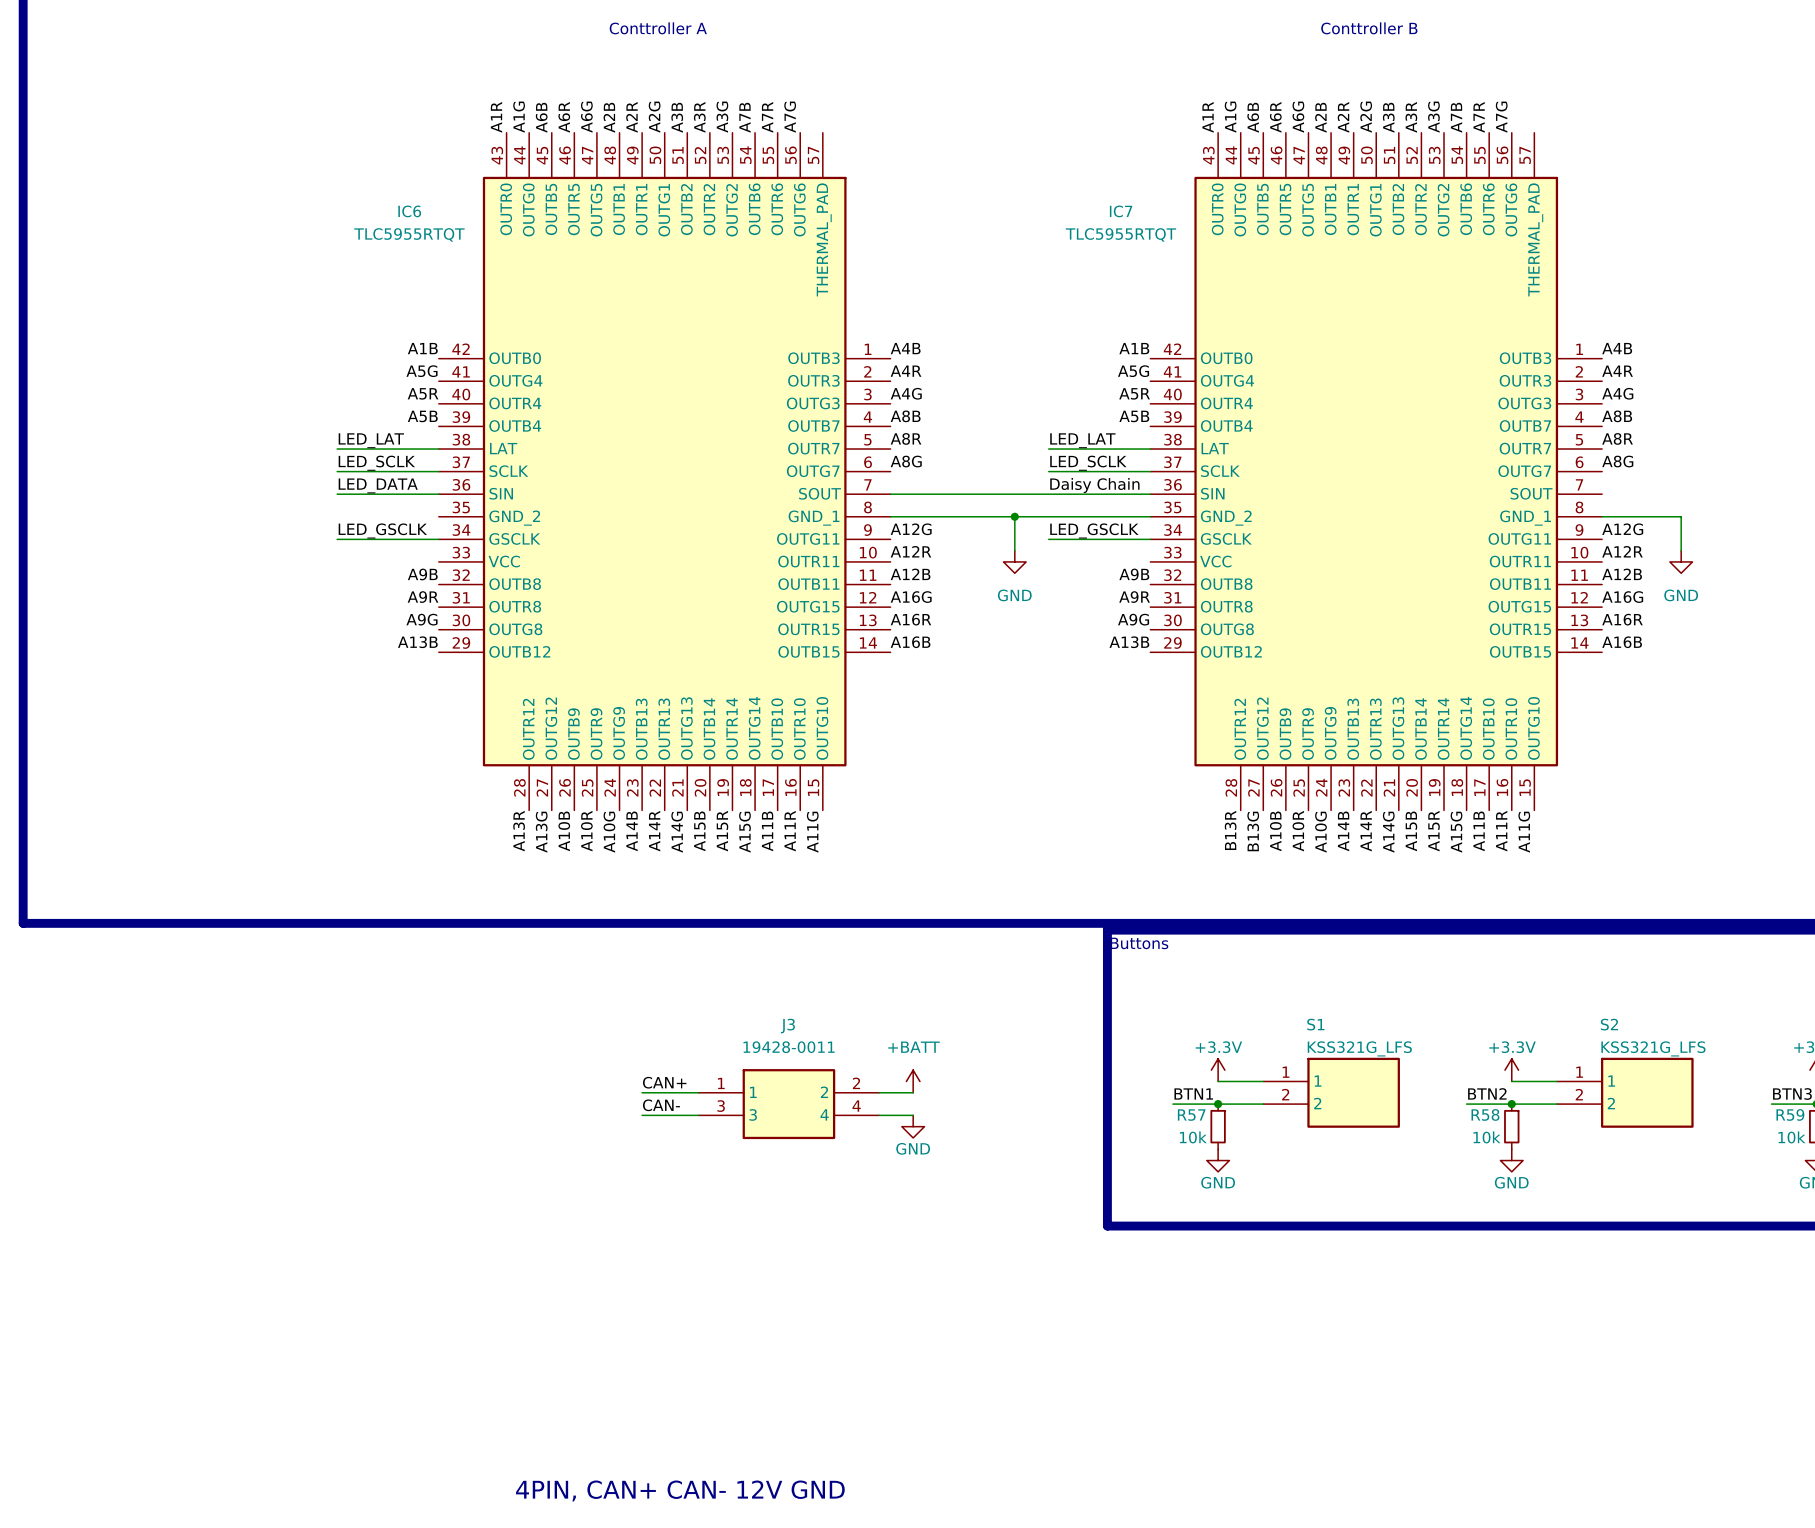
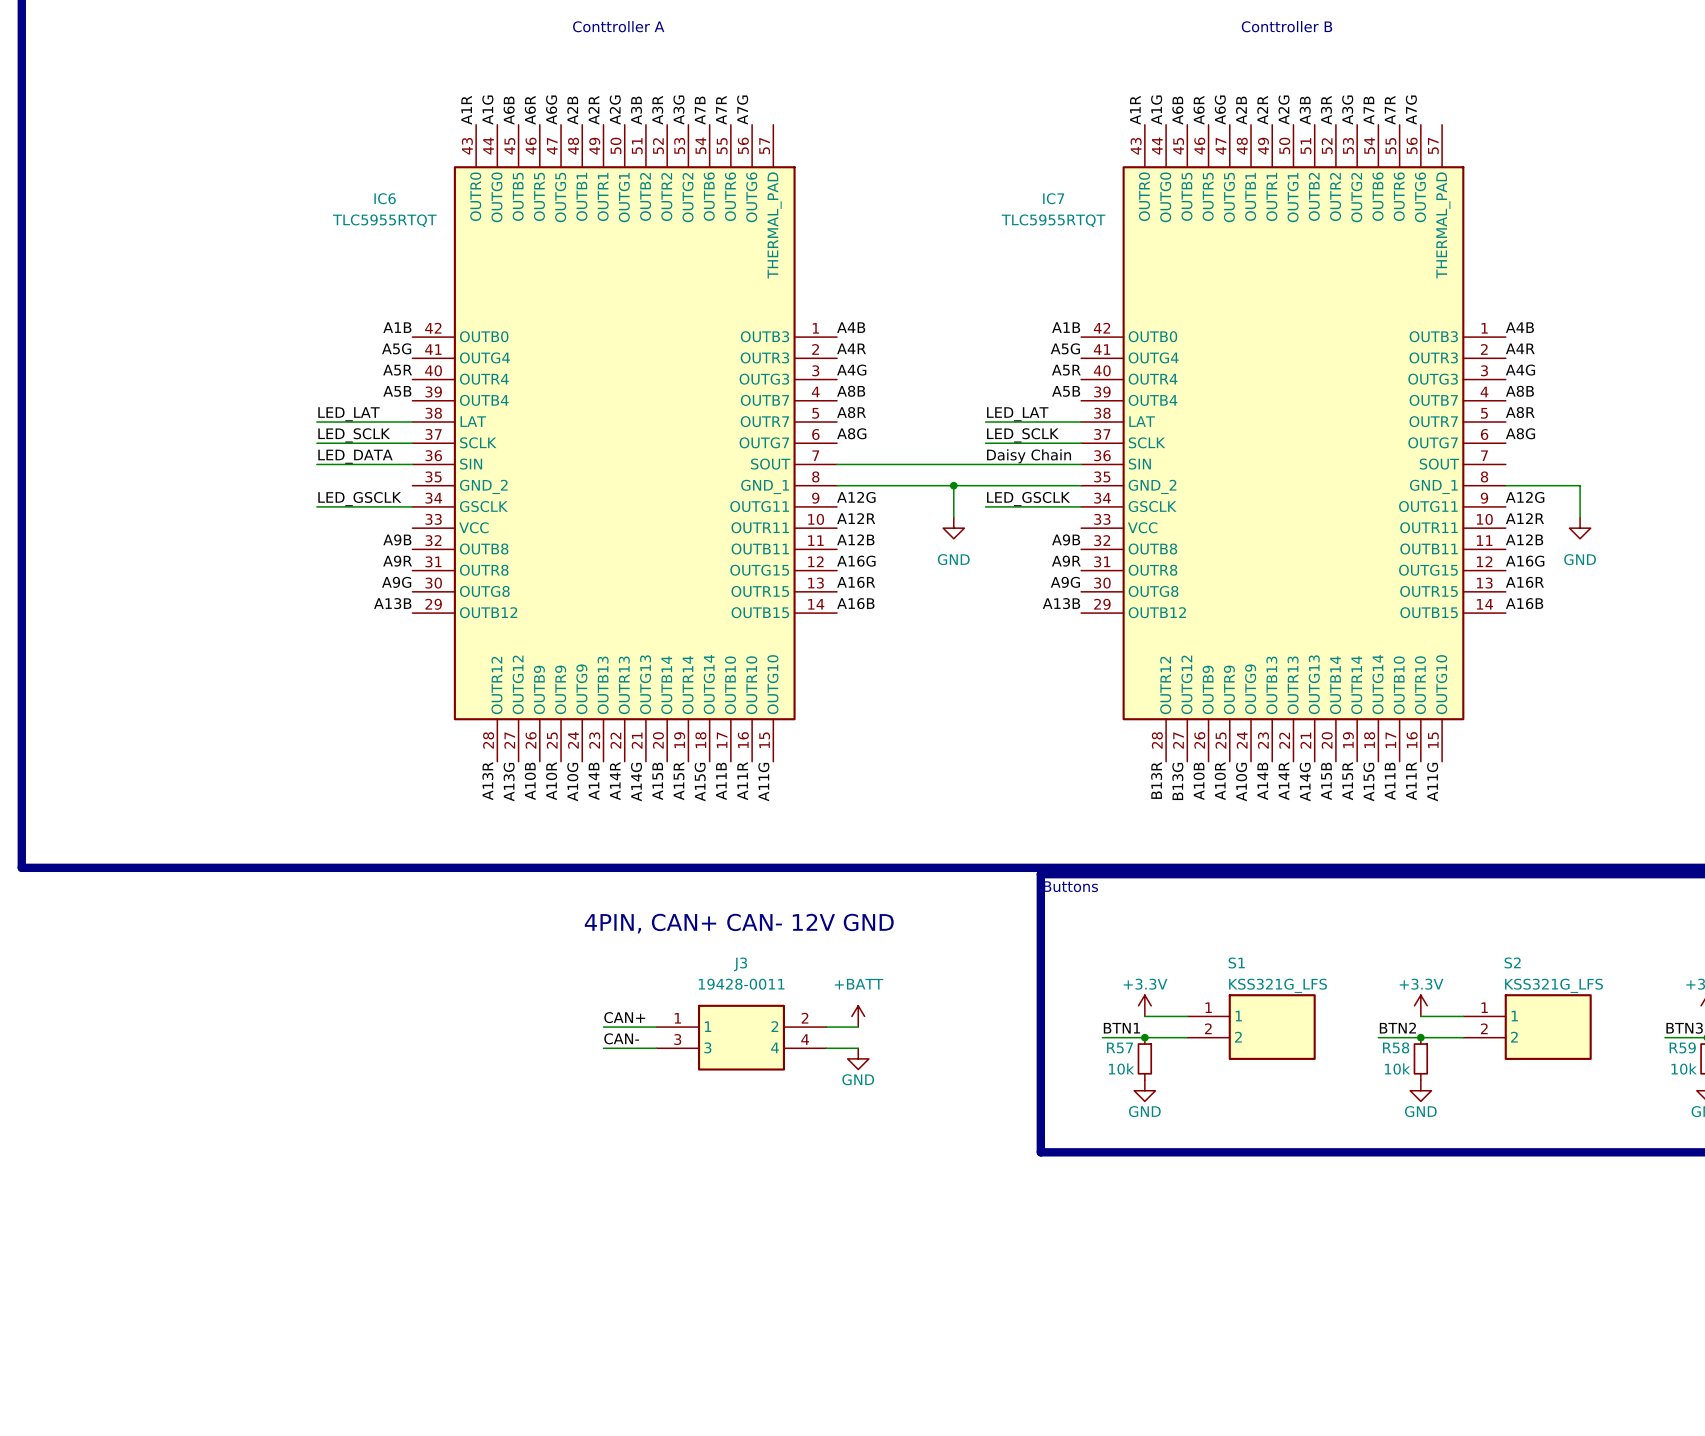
text: none -> 4PIN, CAN+ CAN- 12V GND (739, 923)
text: 4PIN, CAN+ CAN- 12V GND (680, 1490) -> none

